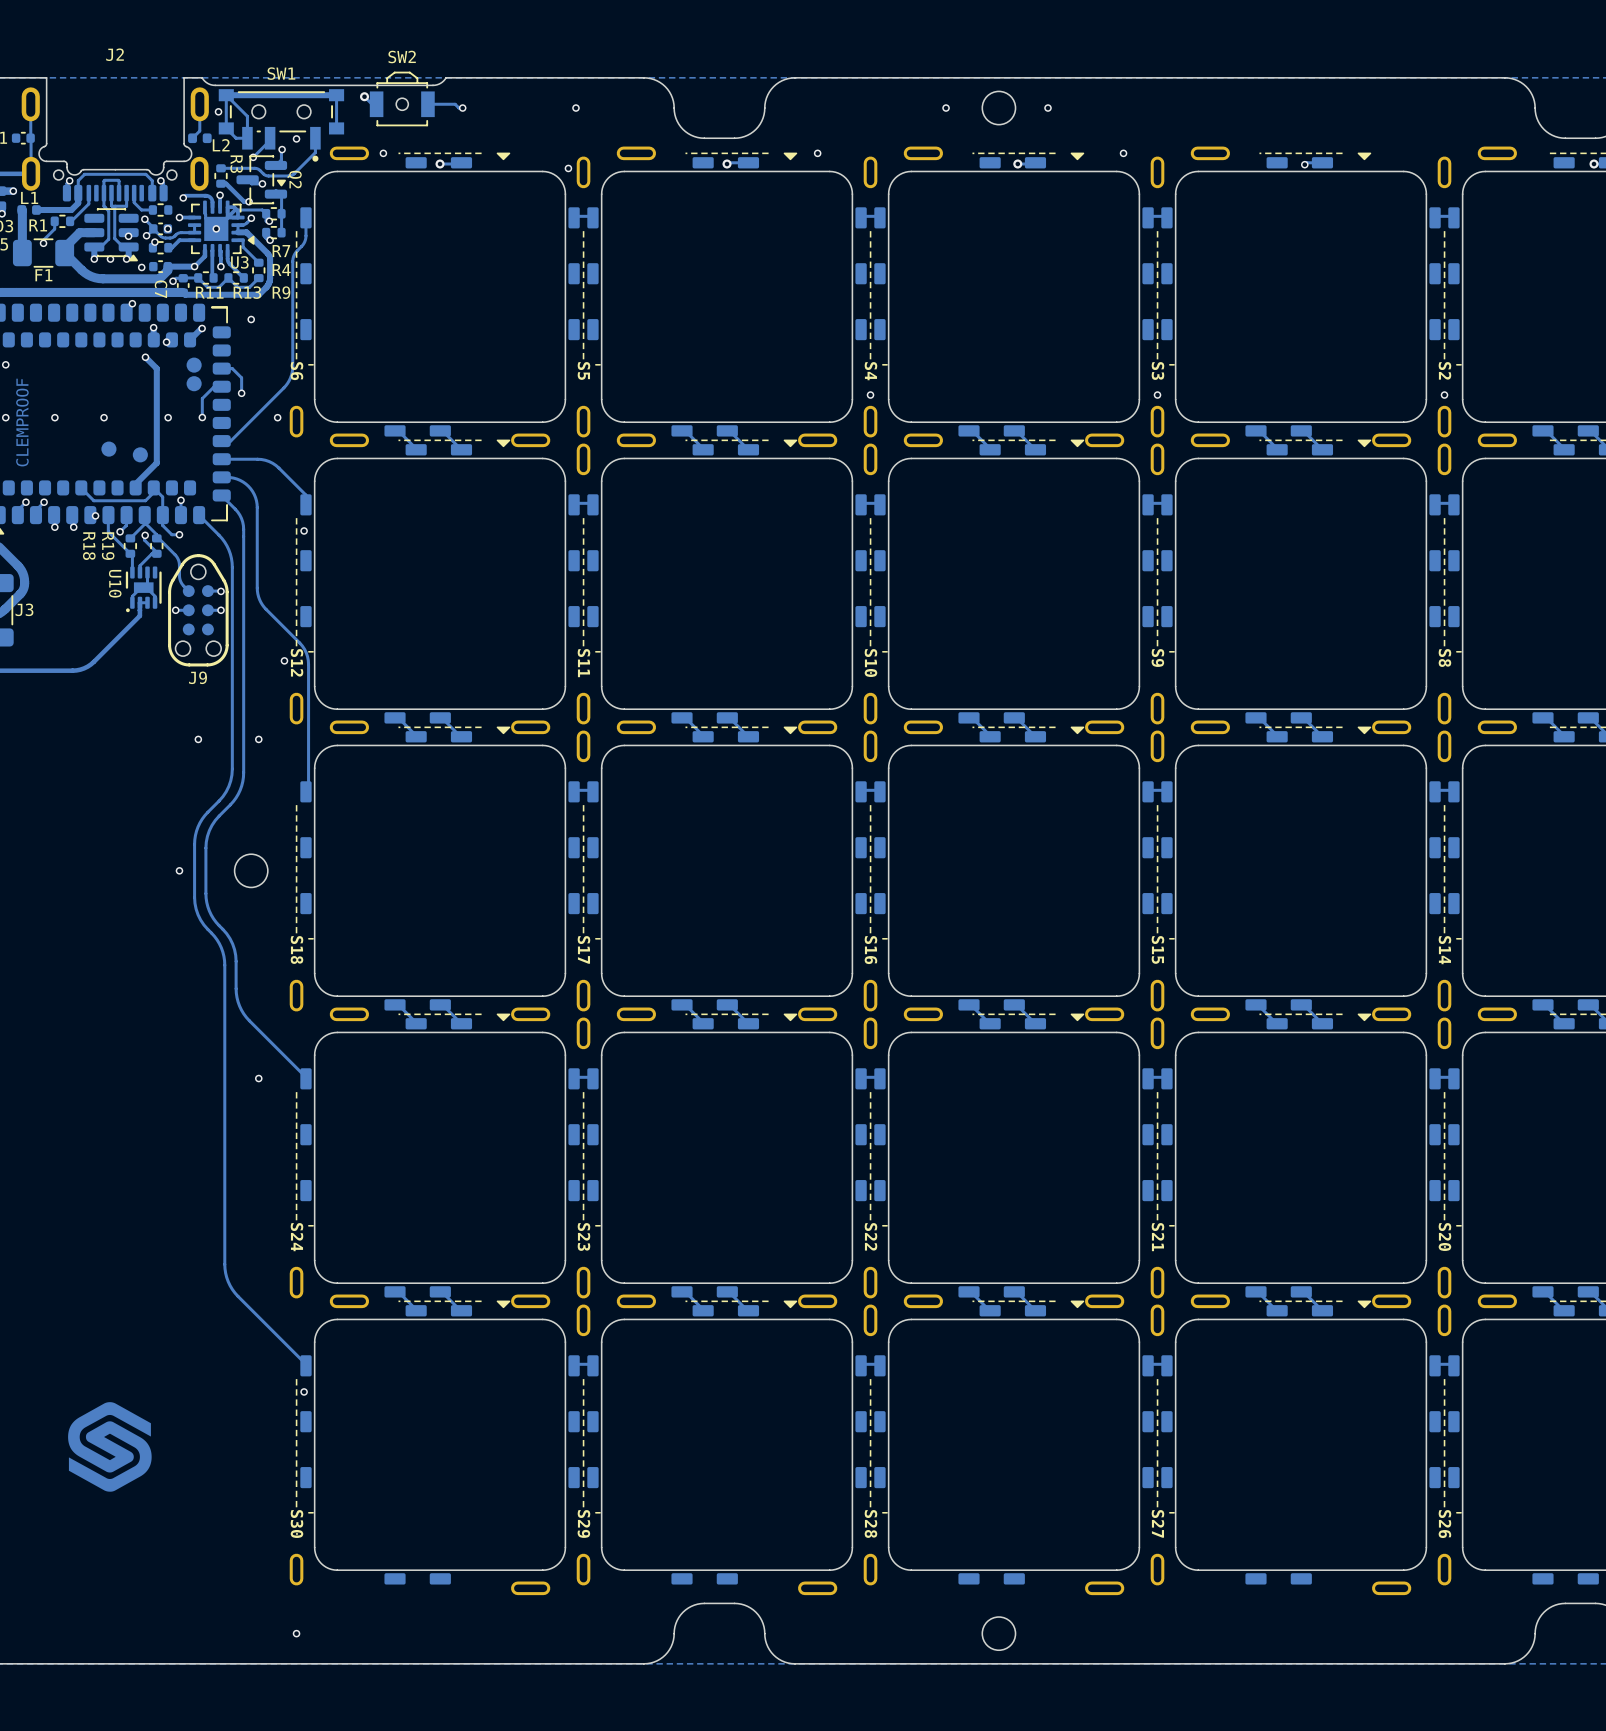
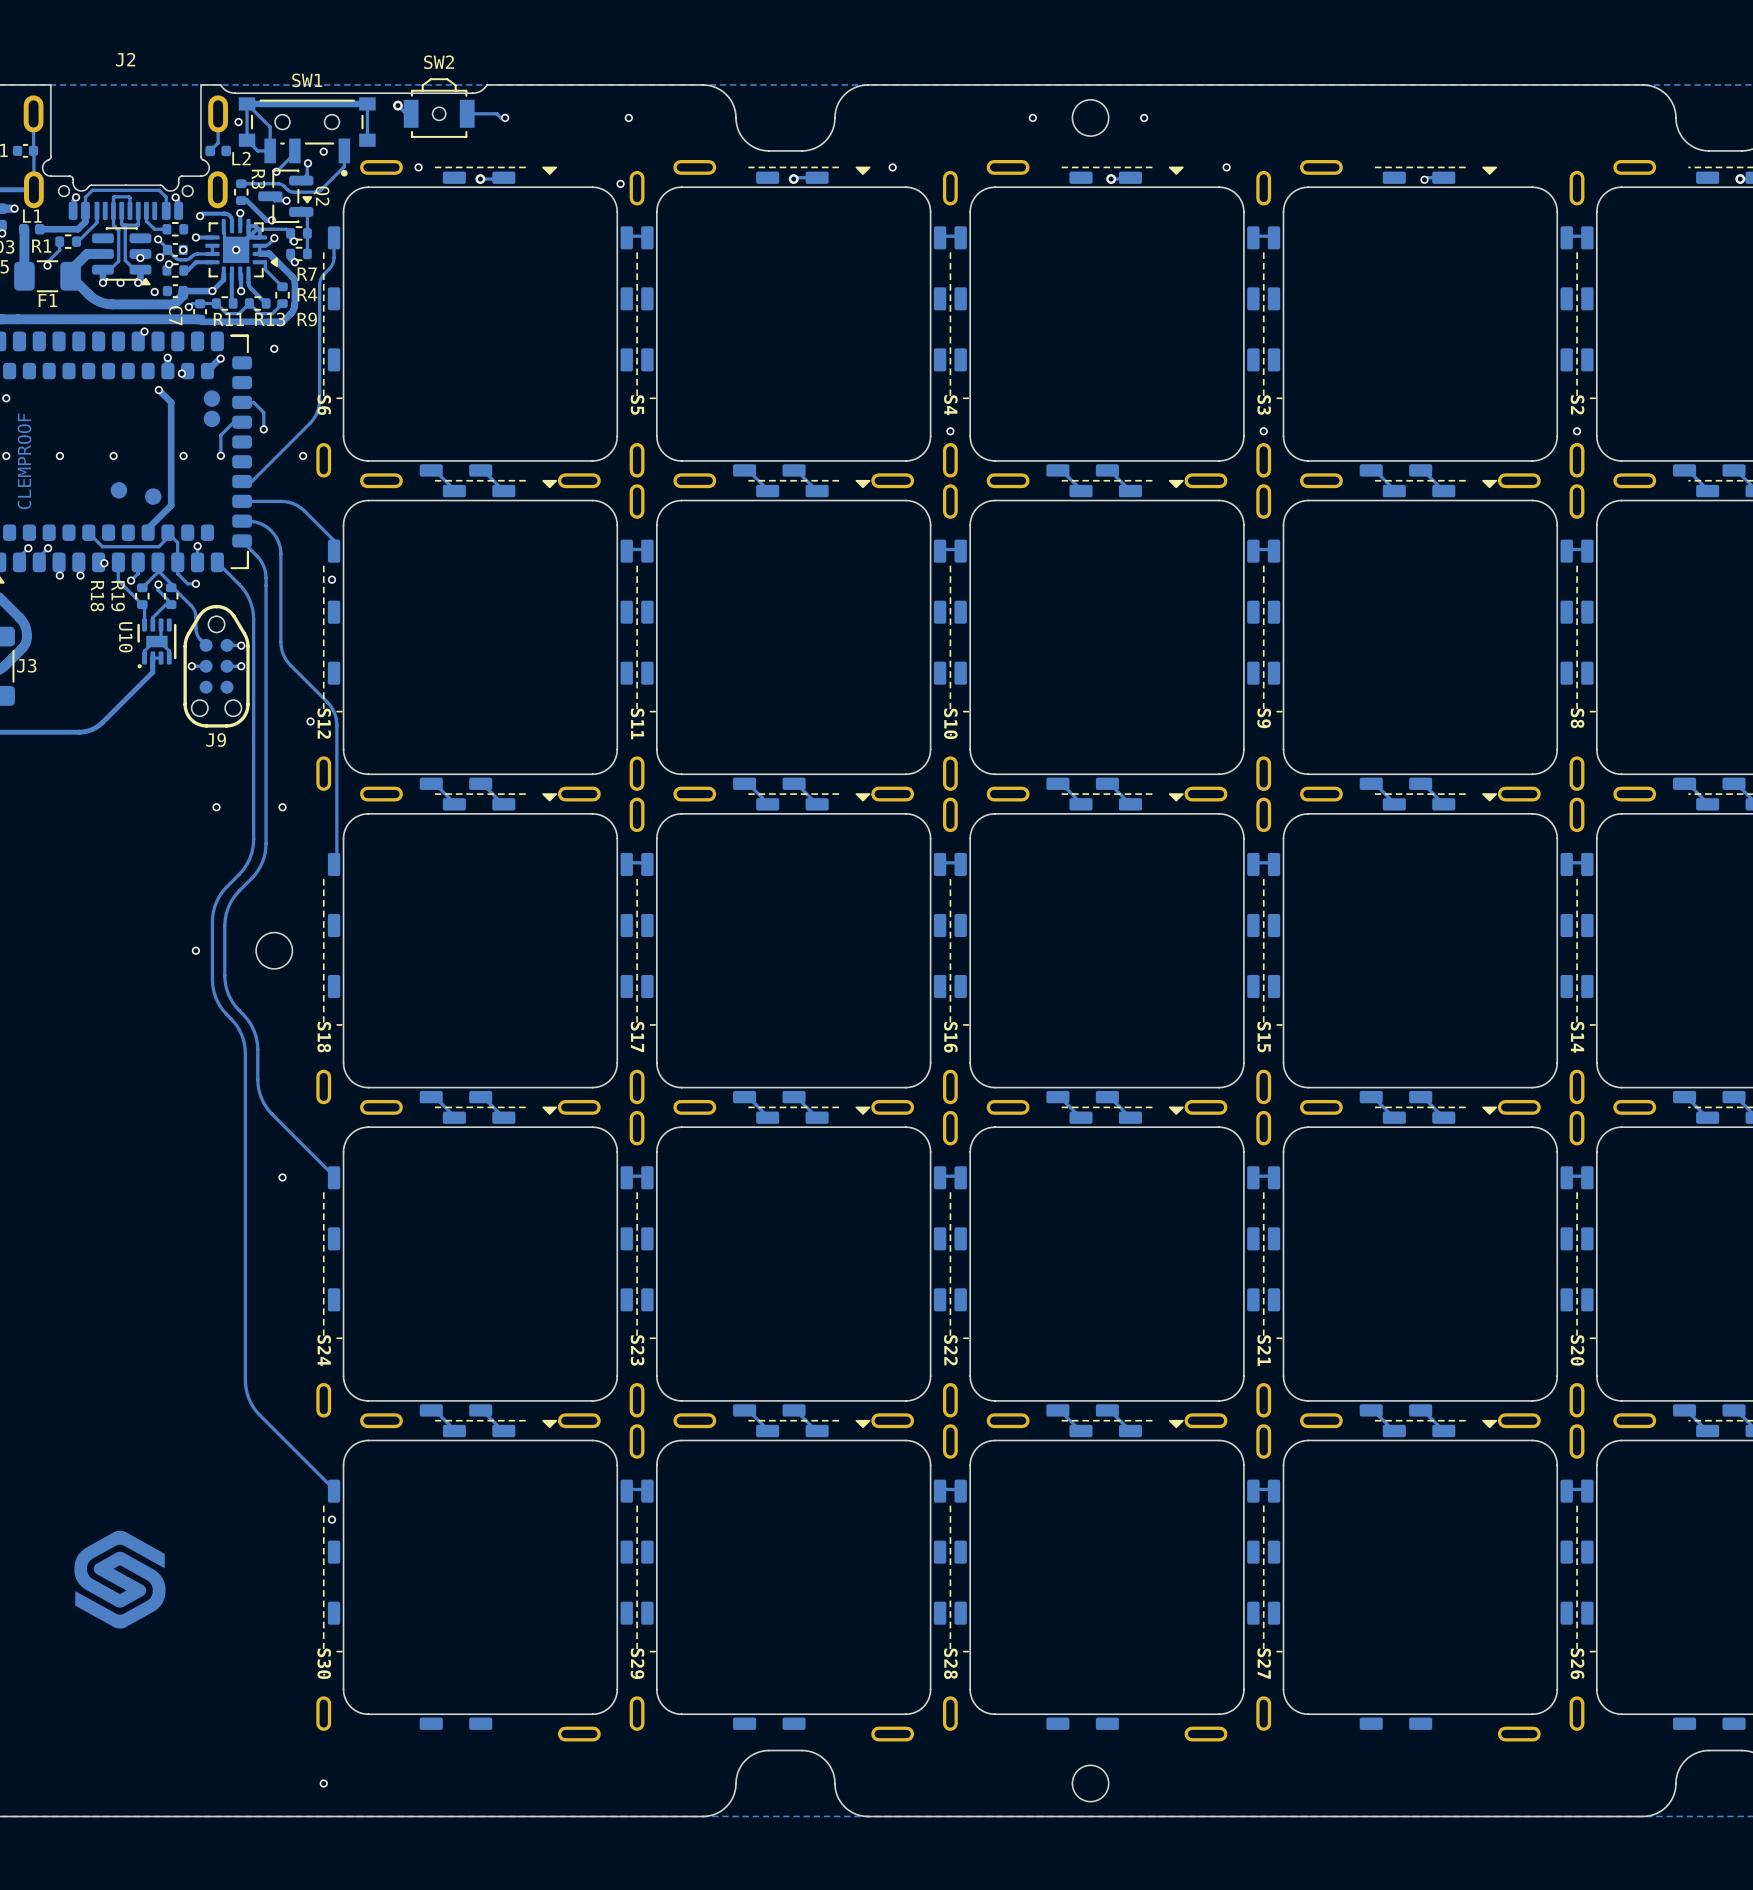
U3 name: U3 (239, 262) -> none

